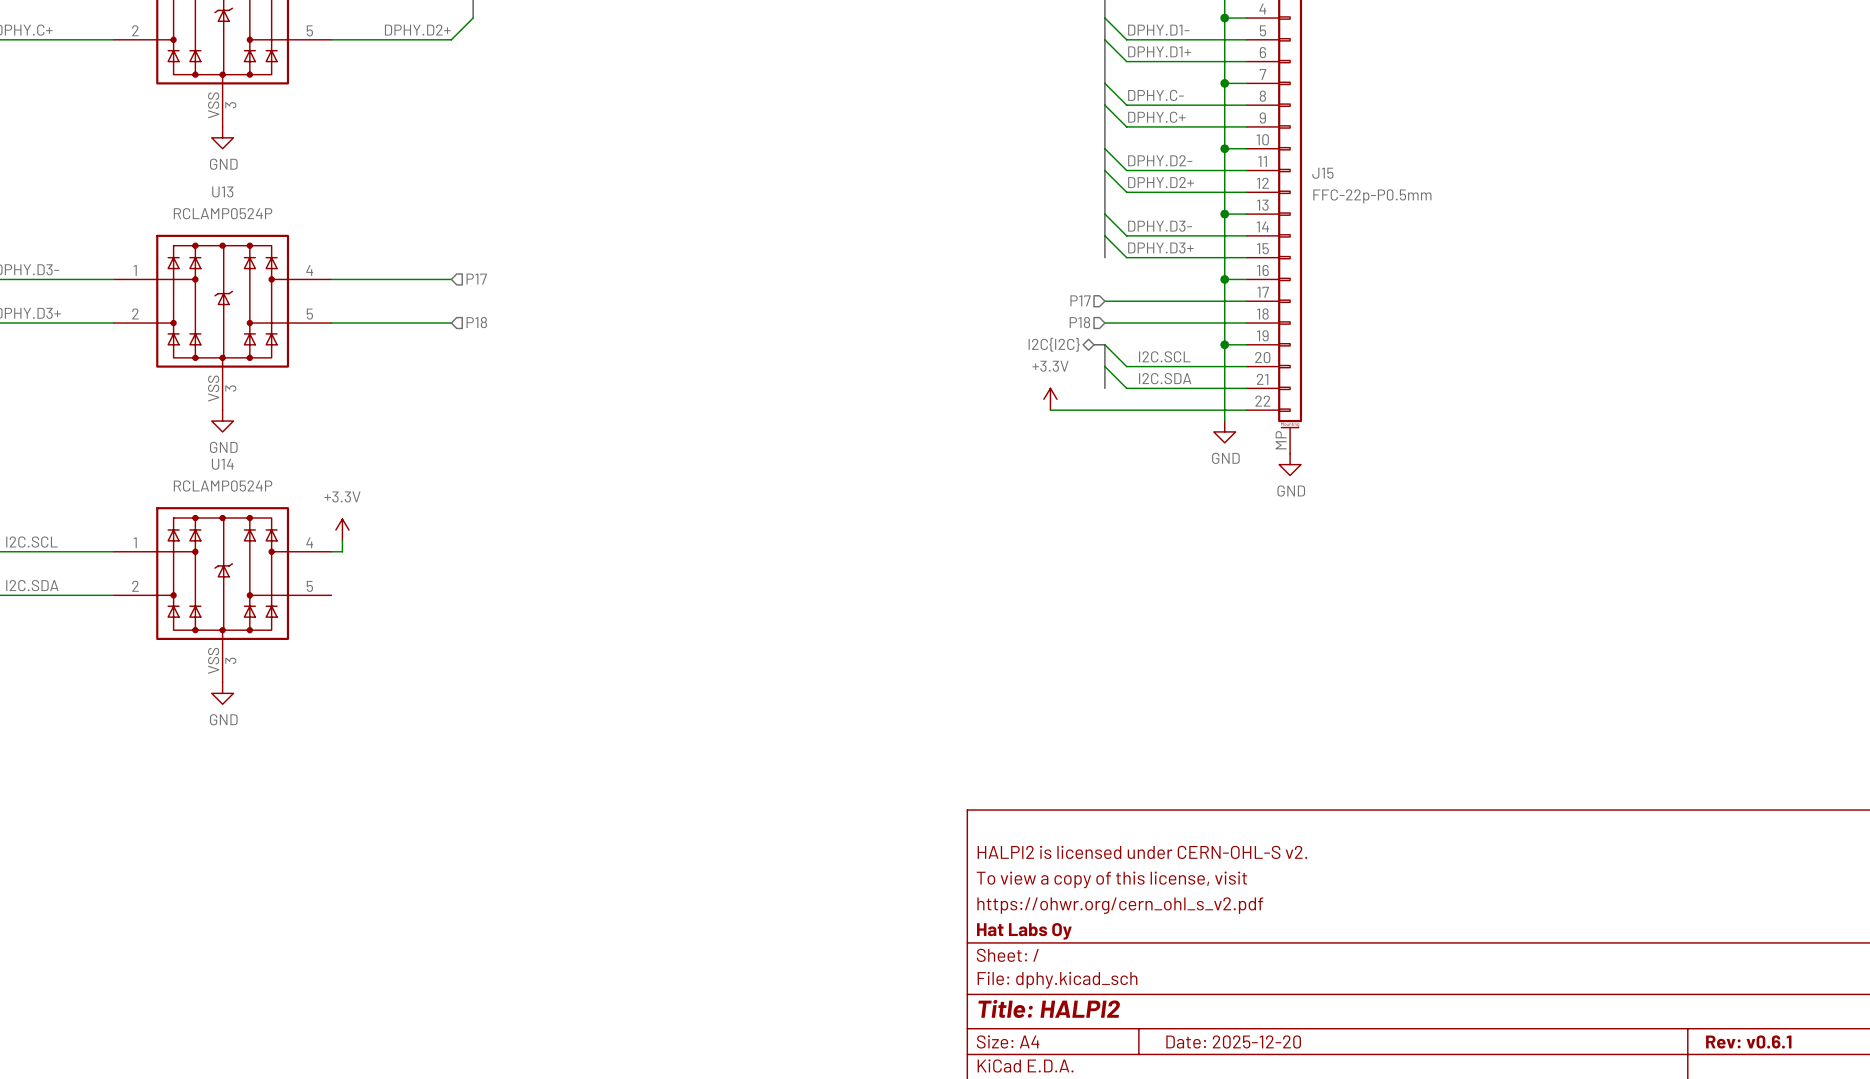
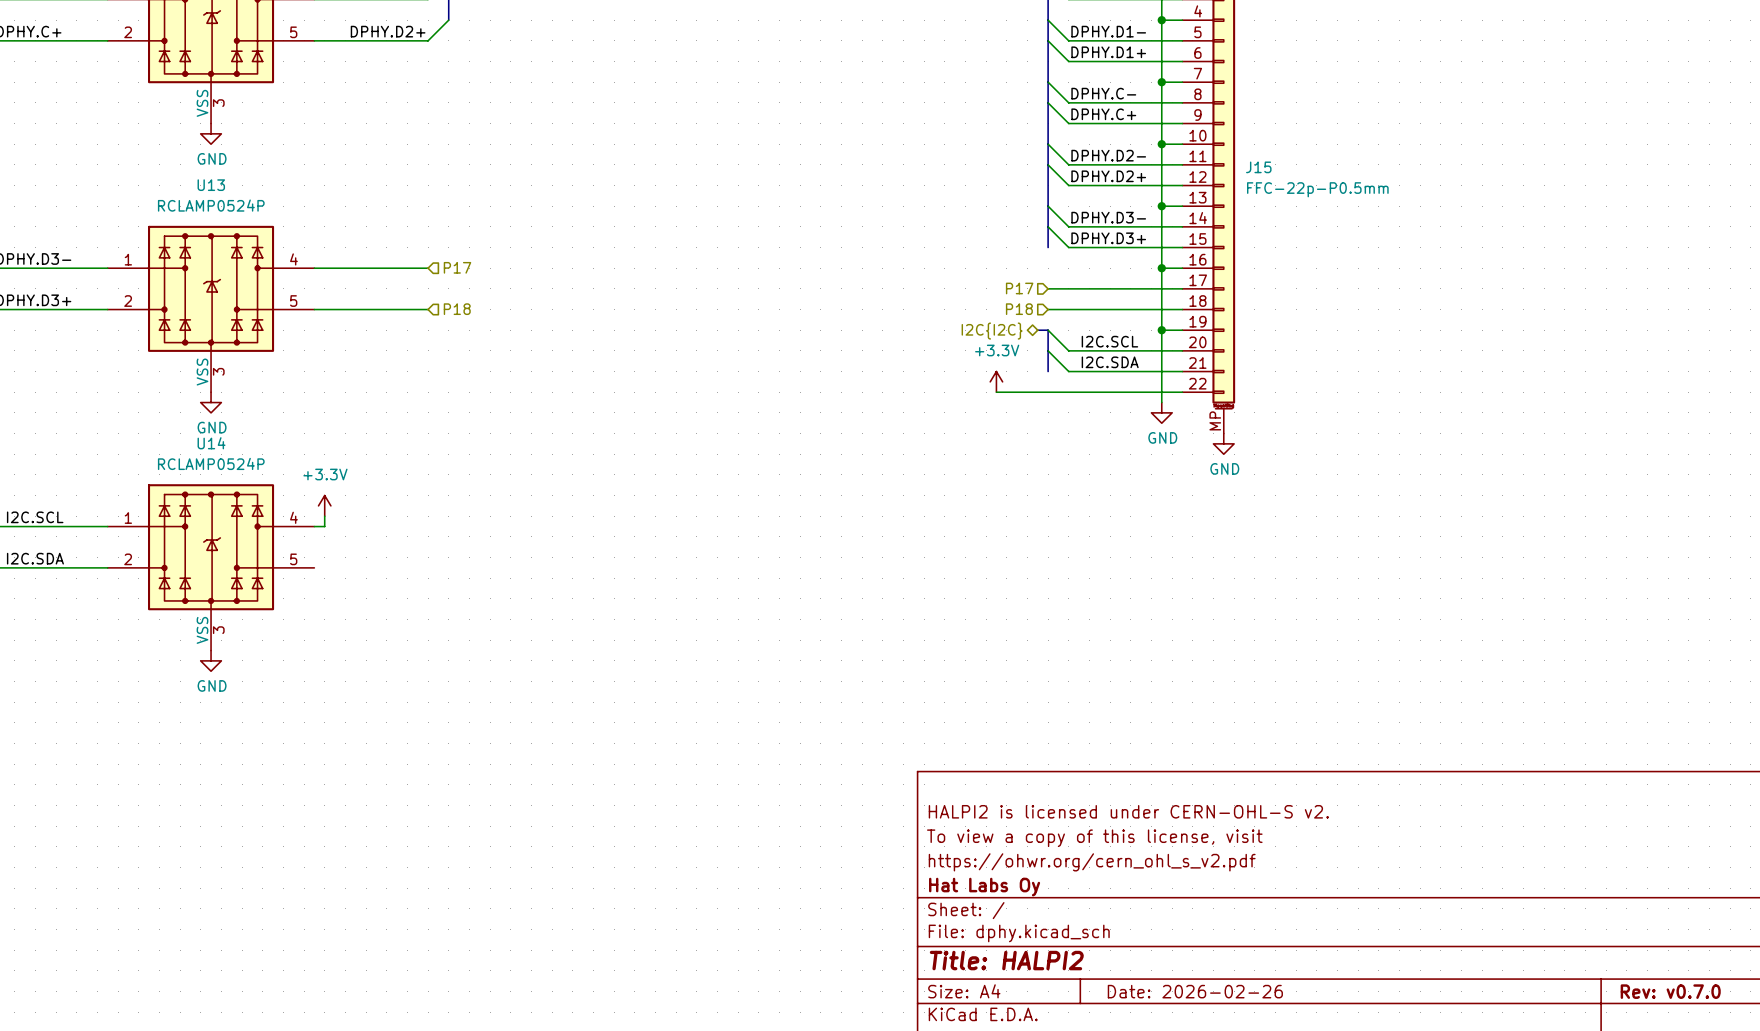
title block: Date: 2025-12-20 (1233, 1041) -> Date: 2026-02-26 (1195, 991)
title block: Rev: v0.6.1 (1748, 1041) -> Rev: v0.7.0 (1670, 991)

